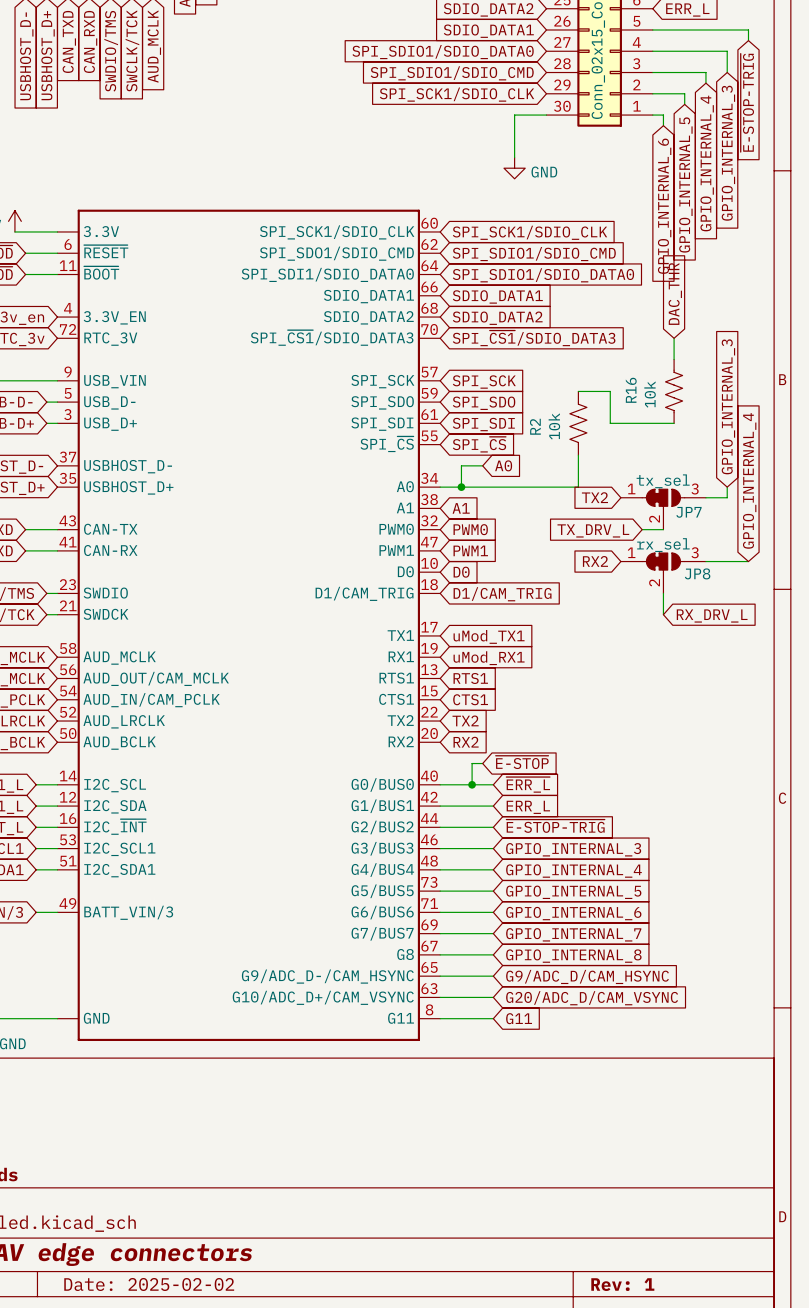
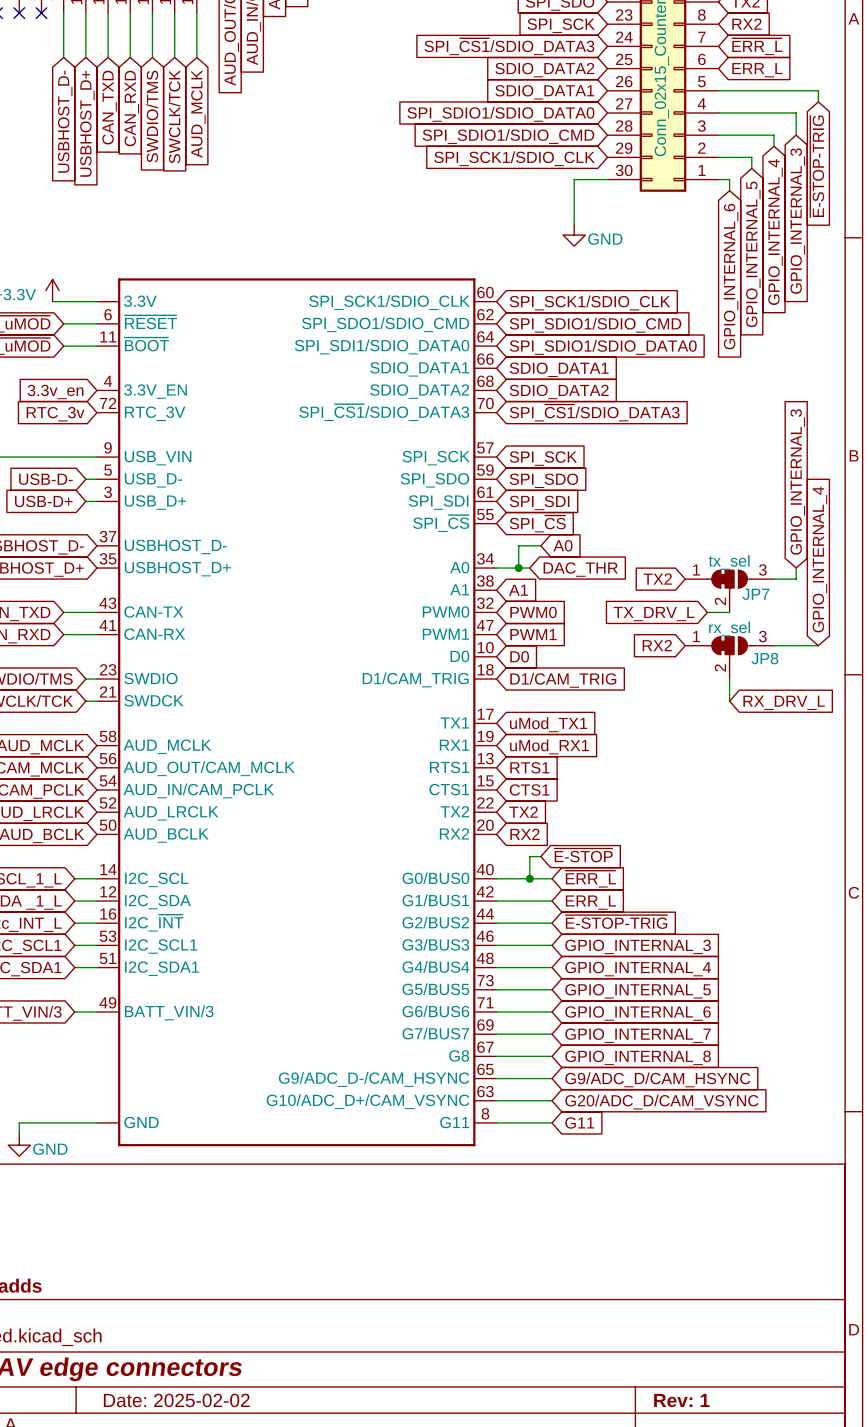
global label: DAC_THR (675, 294) -> none
wire: (674, 338) (674, 359) -> none
wire: (578, 391) (610, 391) (610, 423) (674, 423) -> none
R16: 10k (674, 391) -> none
R2: 10k (578, 423) -> none
wire: (578, 455) (578, 487) (472, 487) -> none
global label: none -> DAC_THR (580, 569)

